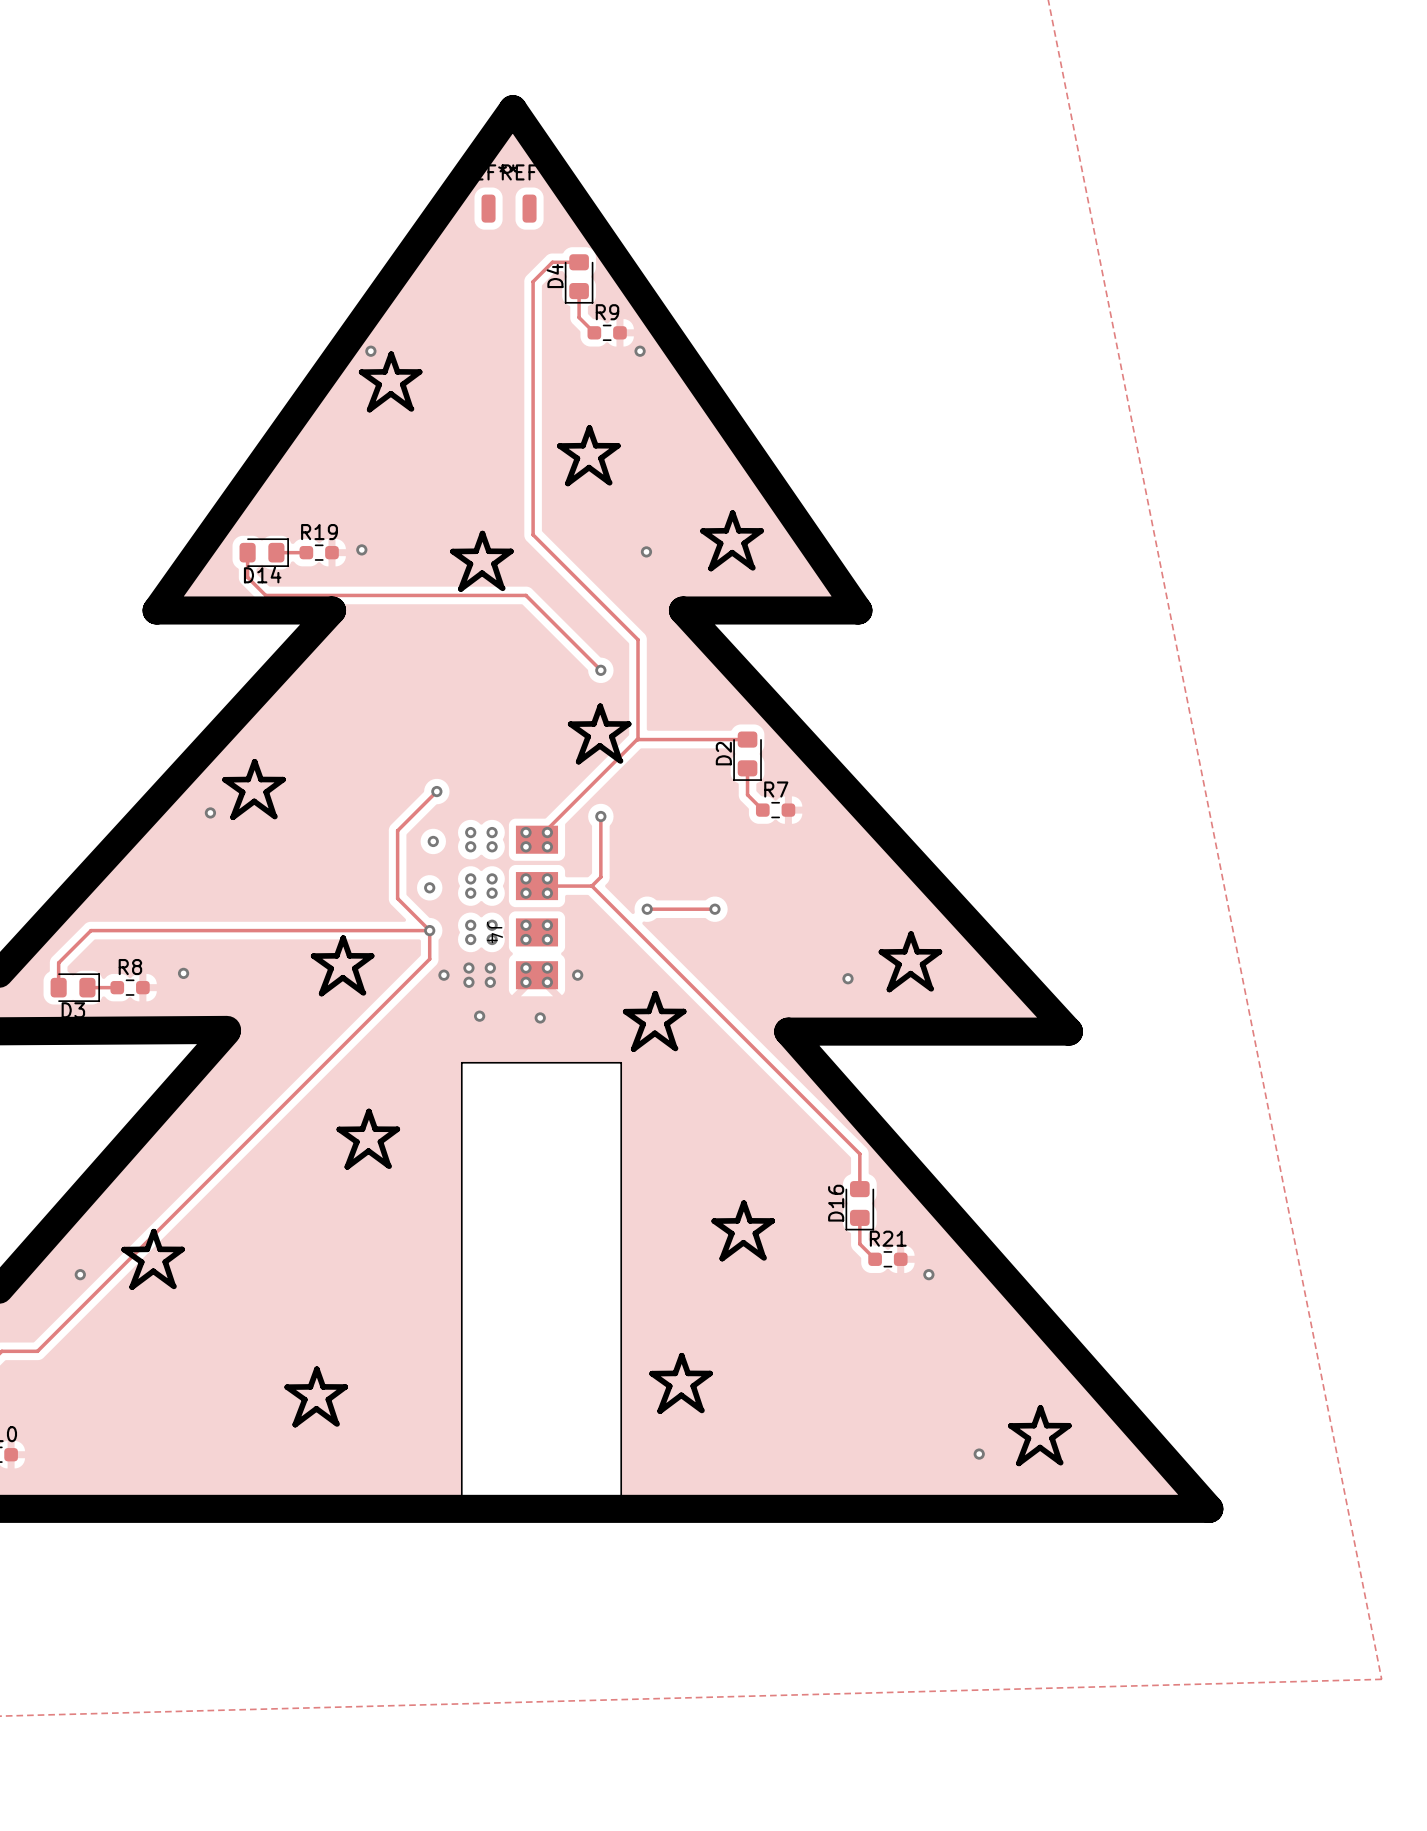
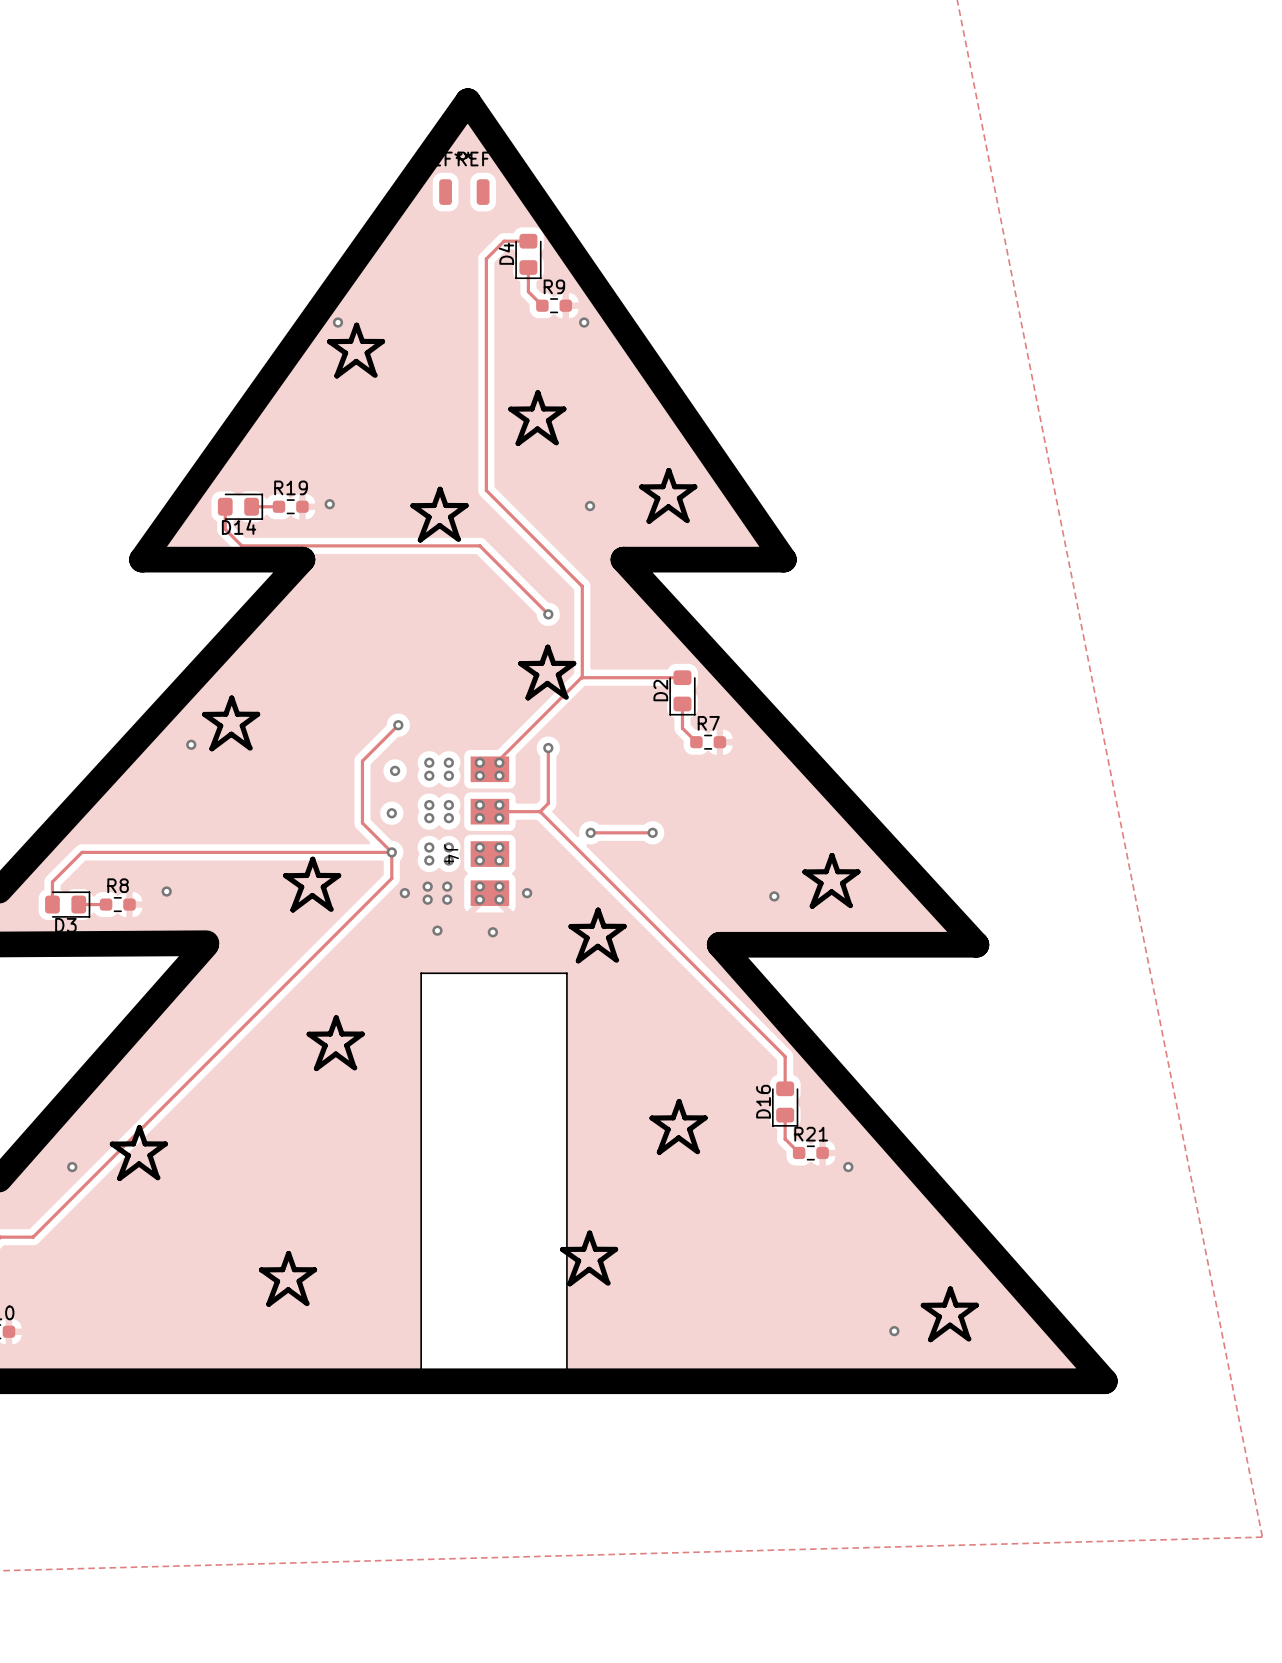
line: (700, 1409) (693, 1386) (710, 1373) (688, 1373) (681, 1355) (675, 1373) (652, 1373) (669, 1386) (660, 1411) (681, 1395) (701, 1410) -> (607, 1282) (600, 1260) (615, 1249) (595, 1249) (589, 1233) (583, 1249) (562, 1249) (578, 1260) (569, 1283) (589, 1269) (608, 1283)

